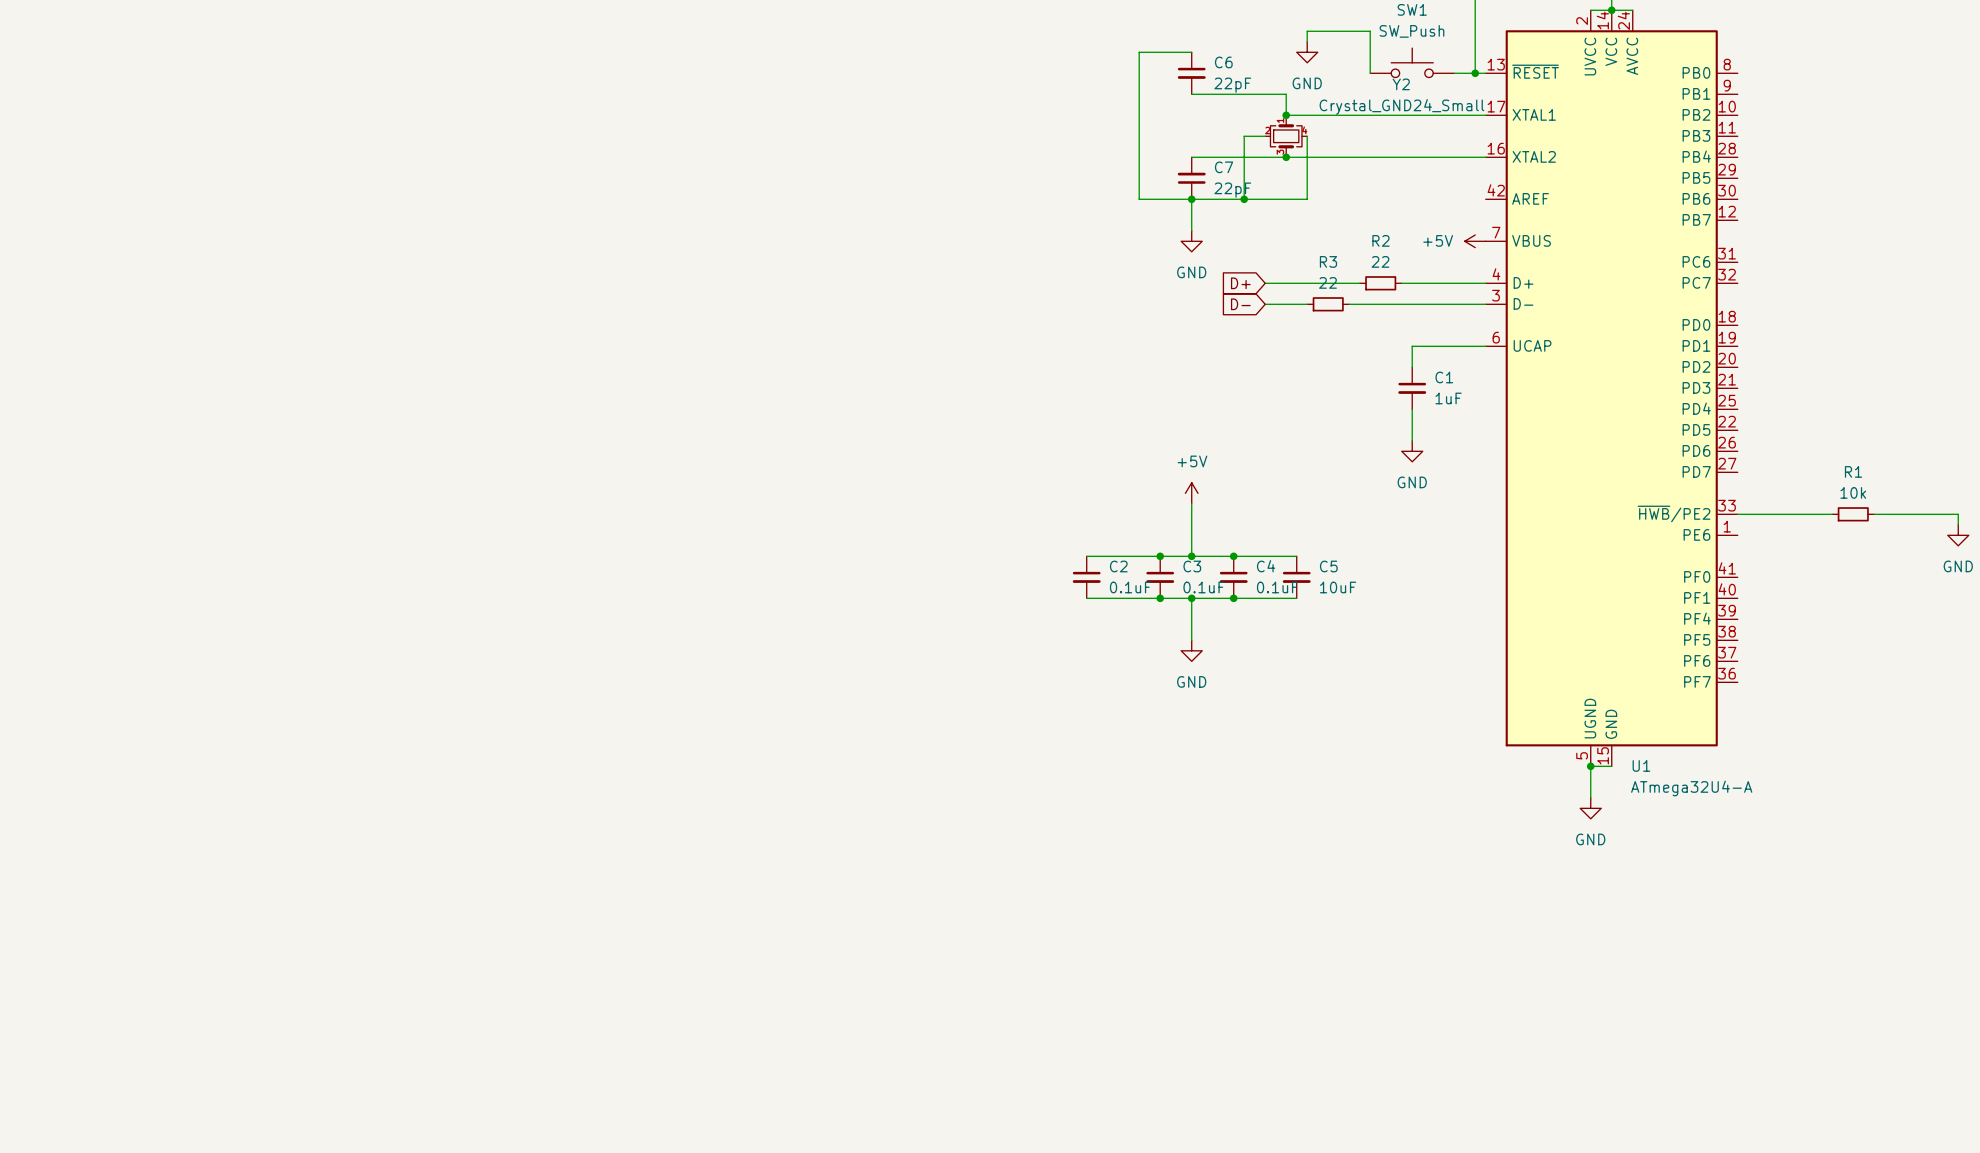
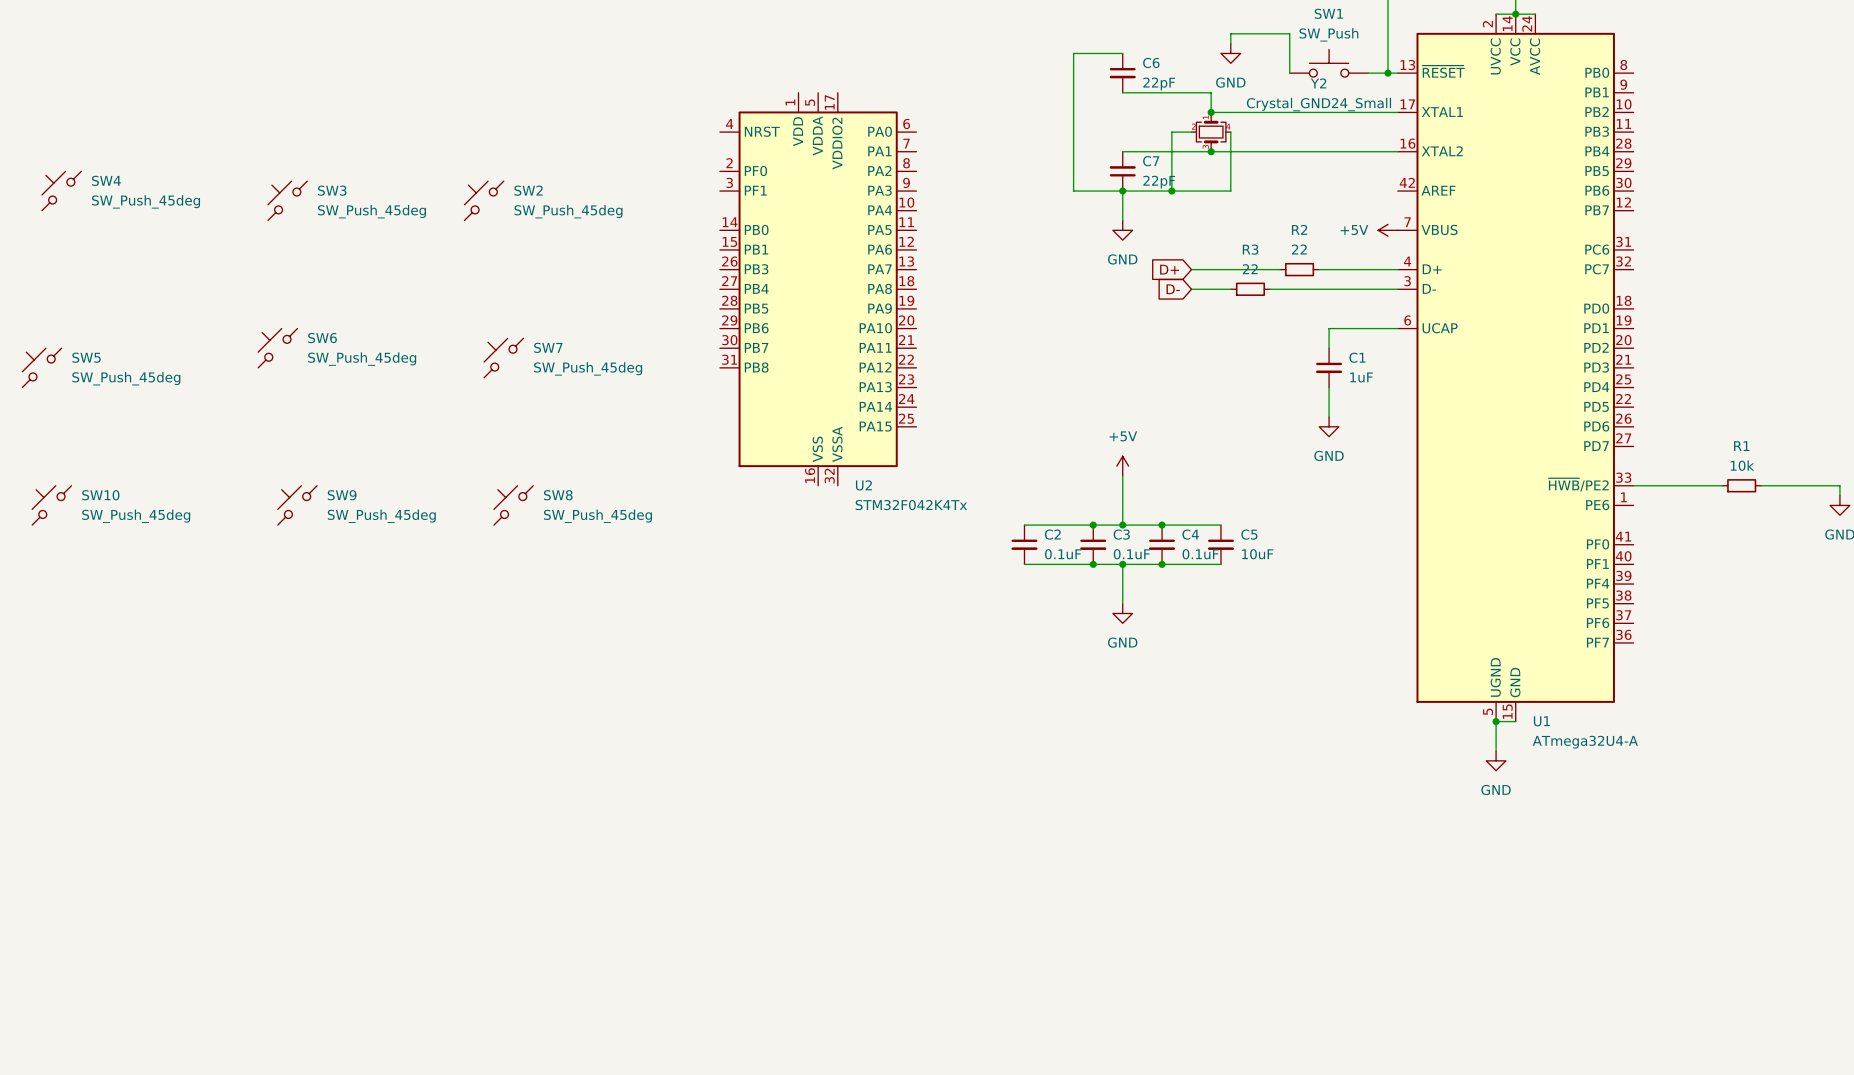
SW4: none -> SW_Push_45deg (61, 191)
SW3: none -> SW_Push_45deg (287, 200)
SW2: none -> SW_Push_45deg (484, 200)
U2: none -> STM32F042K4Tx (818, 289)
SW6: none -> SW_Push_45deg (277, 348)
SW7: none -> SW_Push_45deg (503, 358)
SW5: none -> SW_Push_45deg (41, 367)
SW10: none -> SW_Push_45deg (51, 505)
SW9: none -> SW_Push_45deg (297, 505)
SW8: none -> SW_Push_45deg (513, 505)

